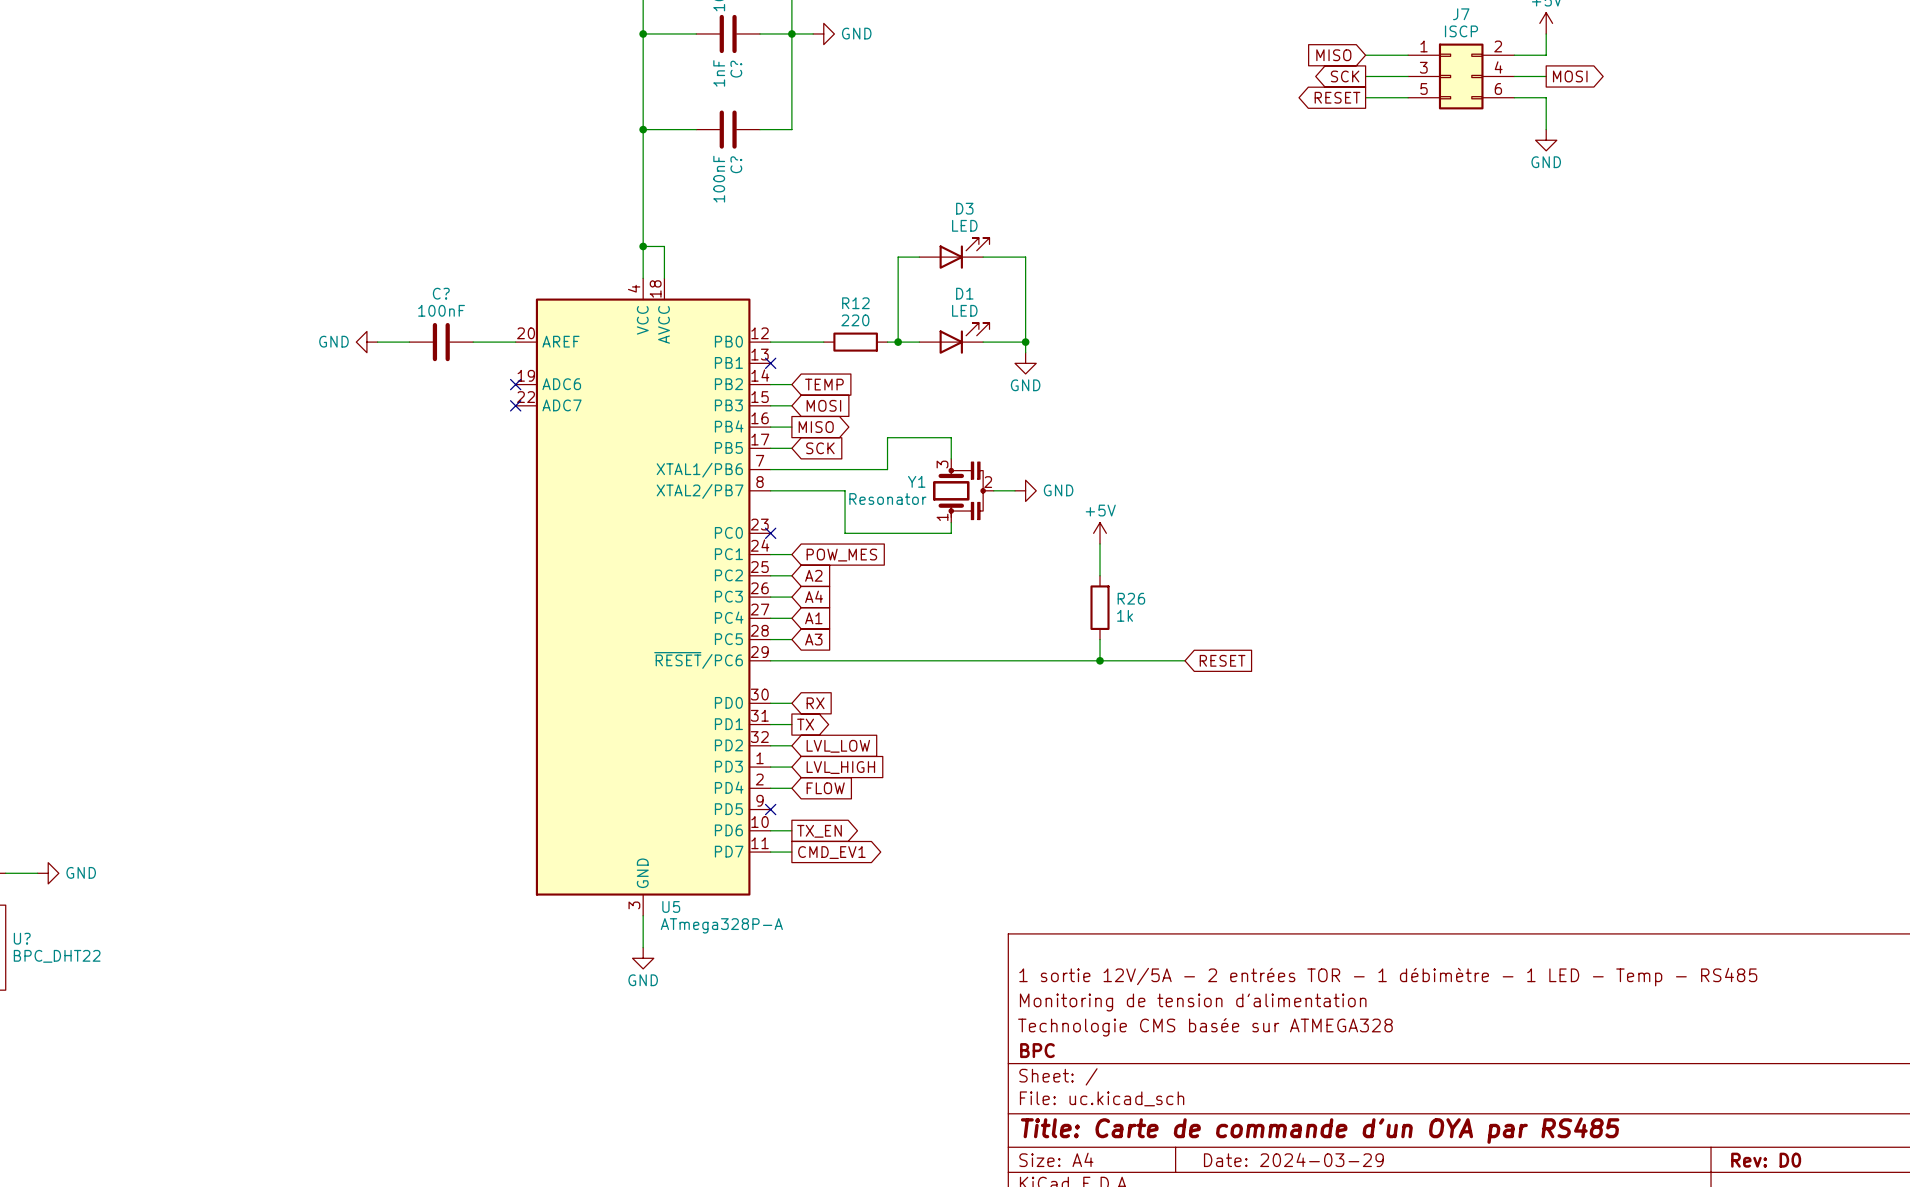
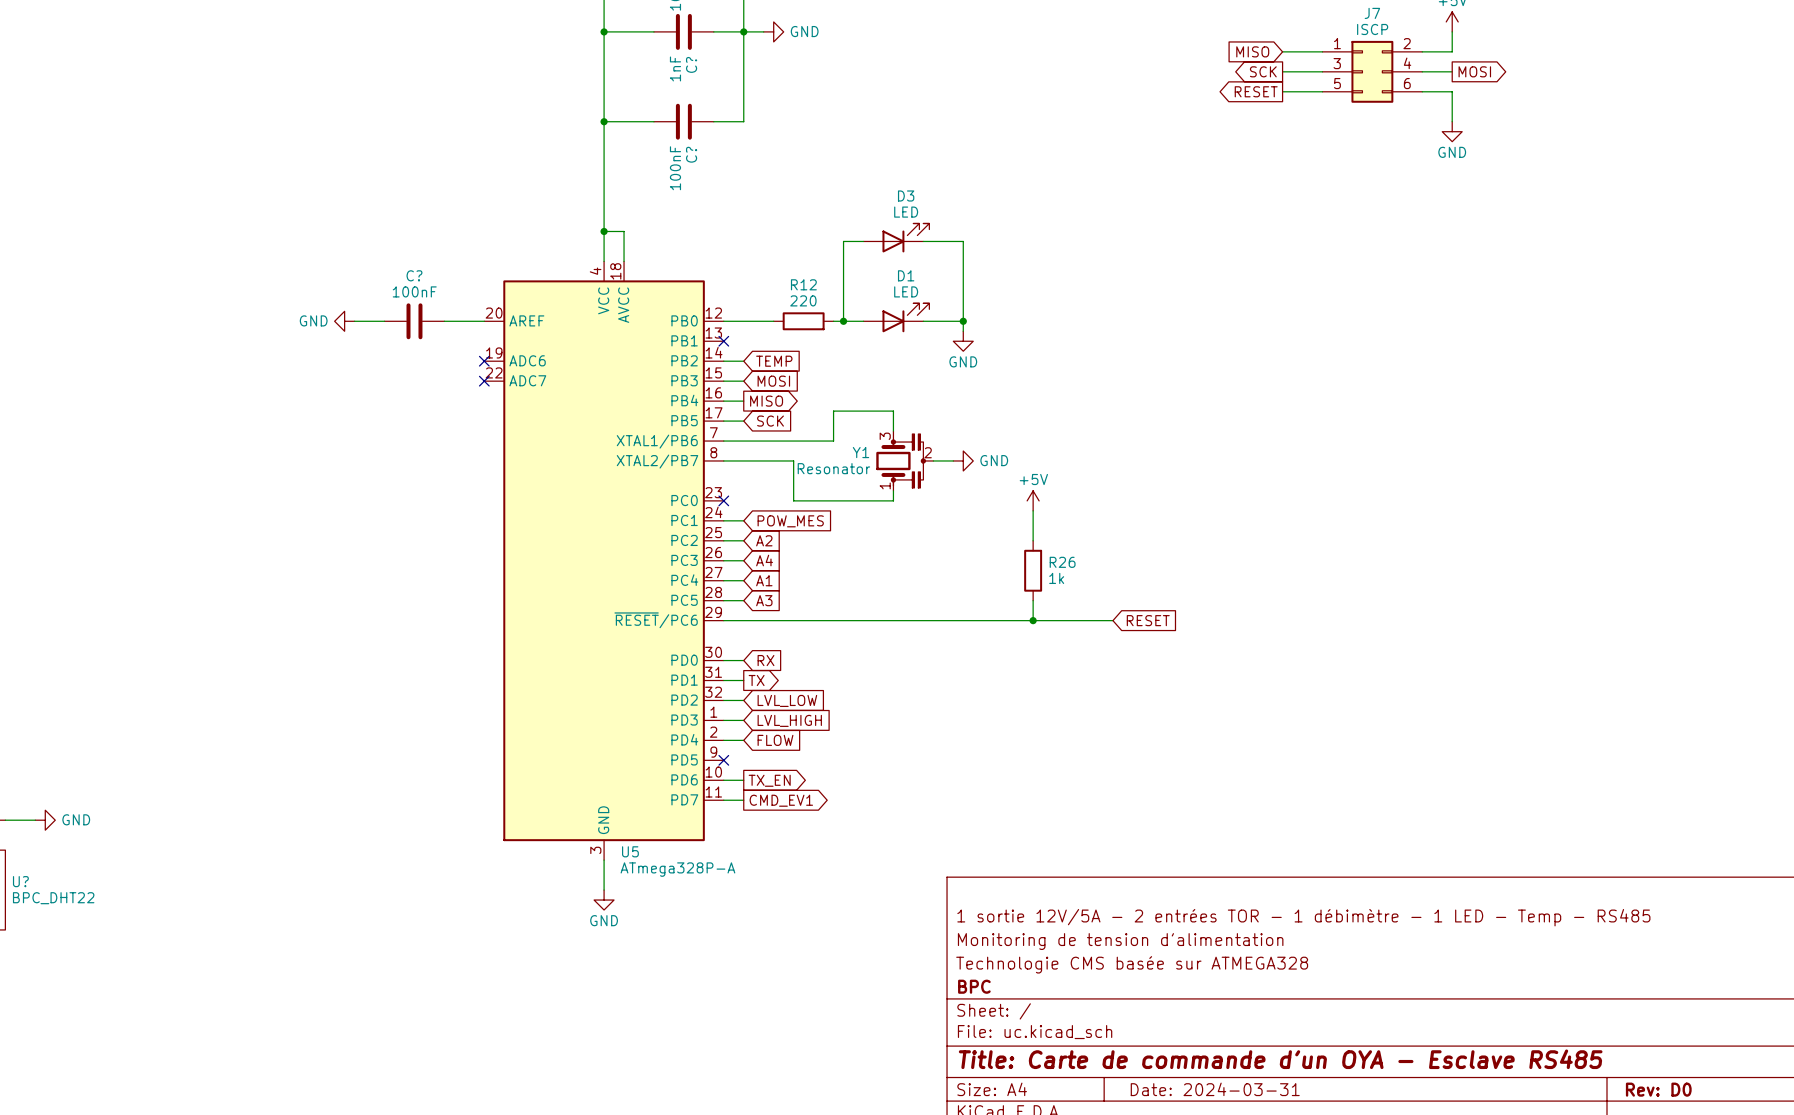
title block: Title: Carte de commande d'un OYA par RS485 (1320, 1130) -> Title: Carte de commande d'un OYA - Esclave RS485 (1280, 1059)
title block: Date: 2024-03-29 (1293, 1159) -> Date: 2024-03-31 (1215, 1089)

